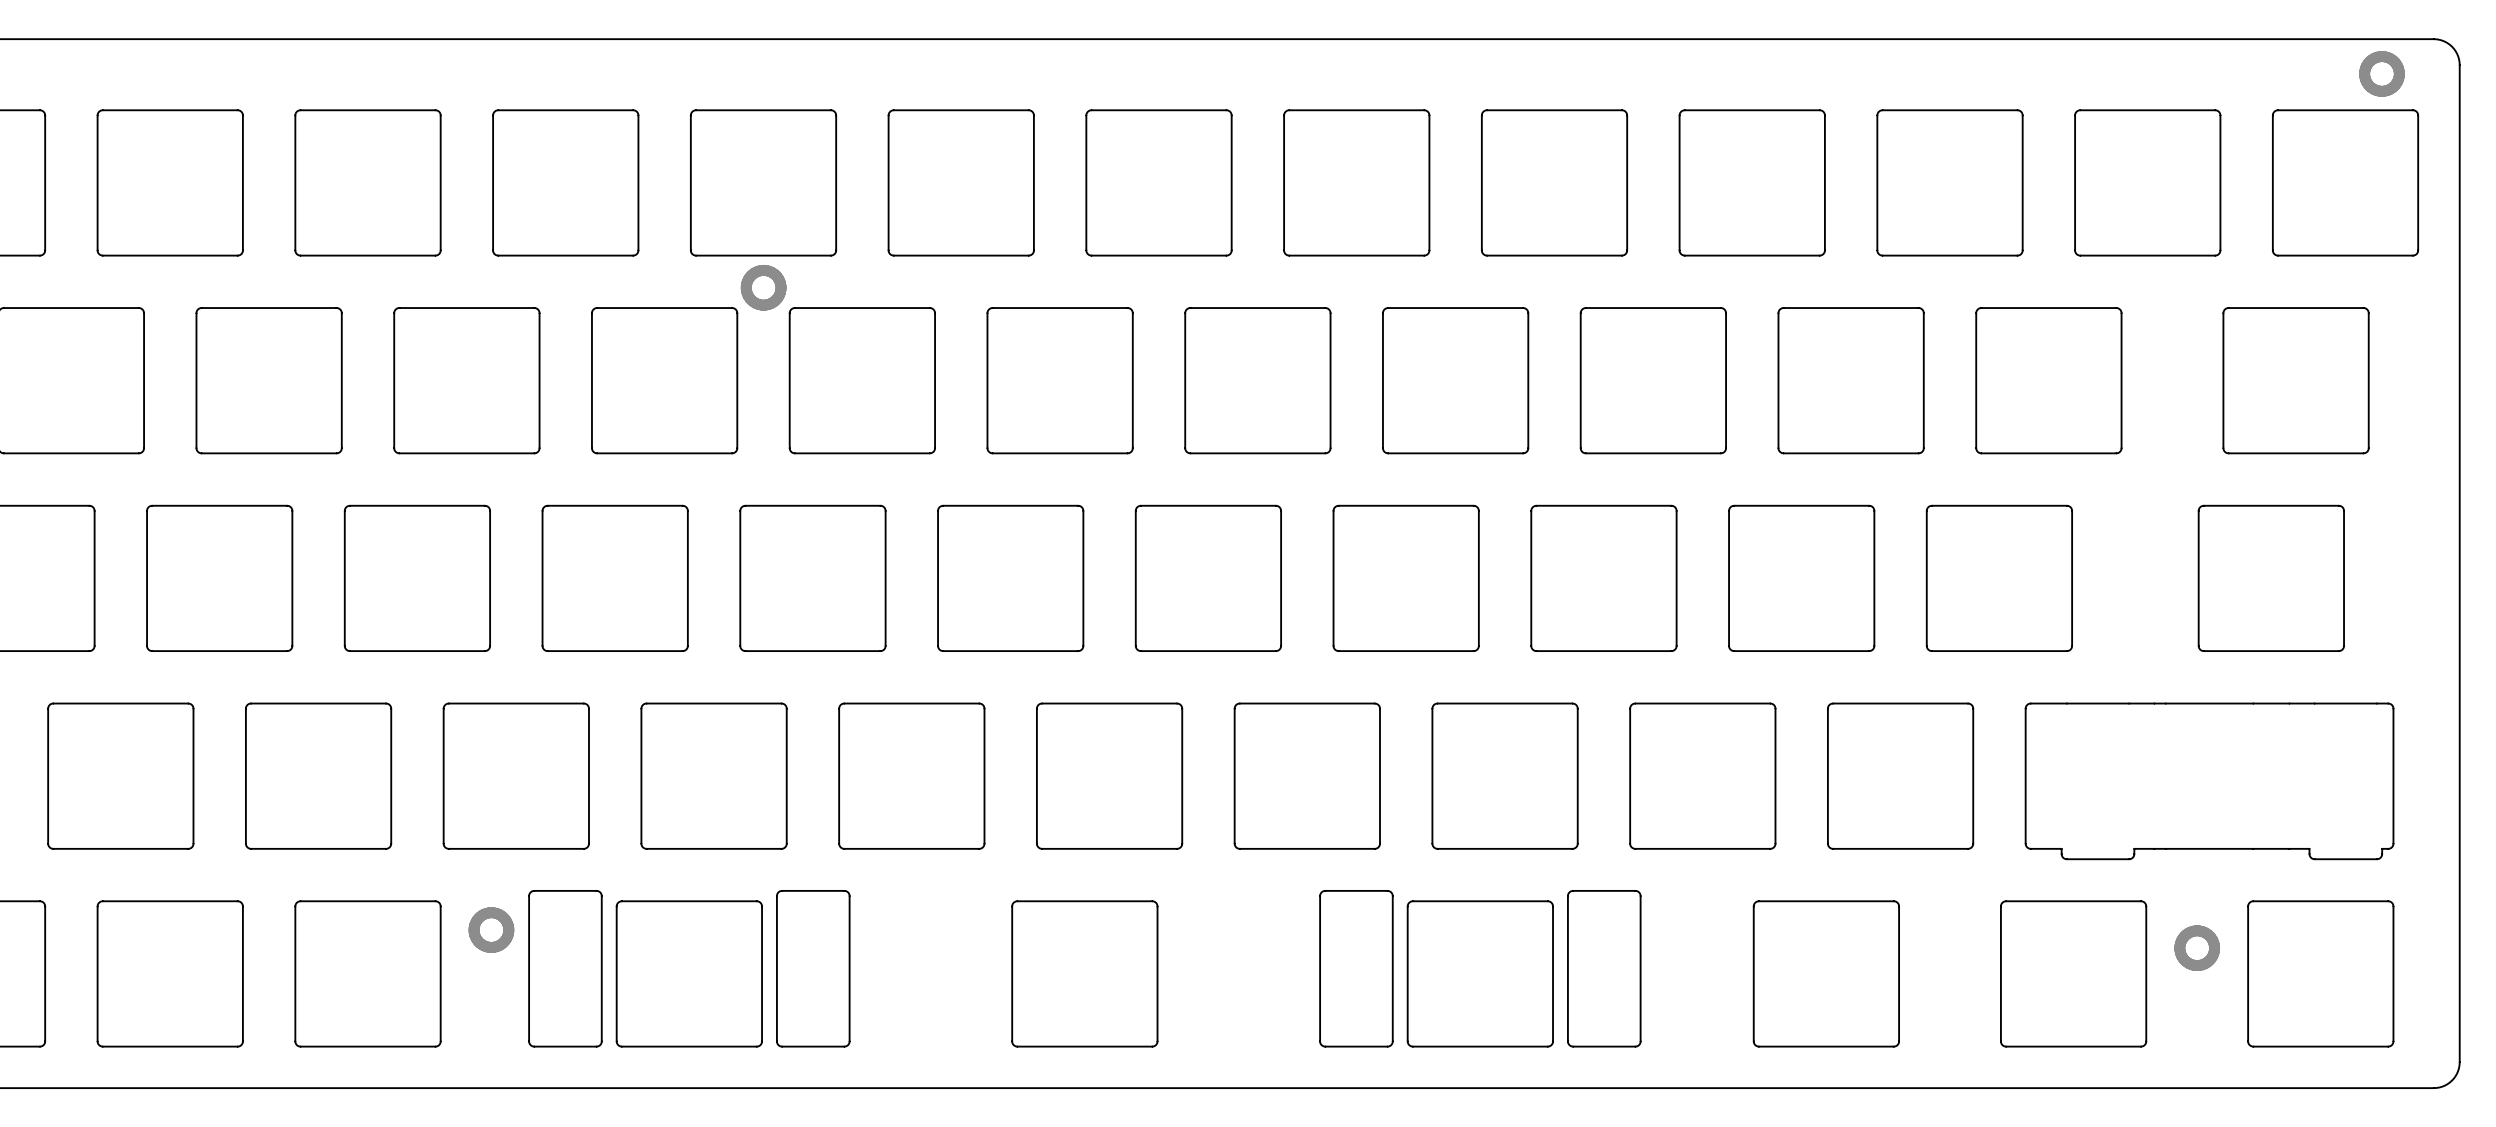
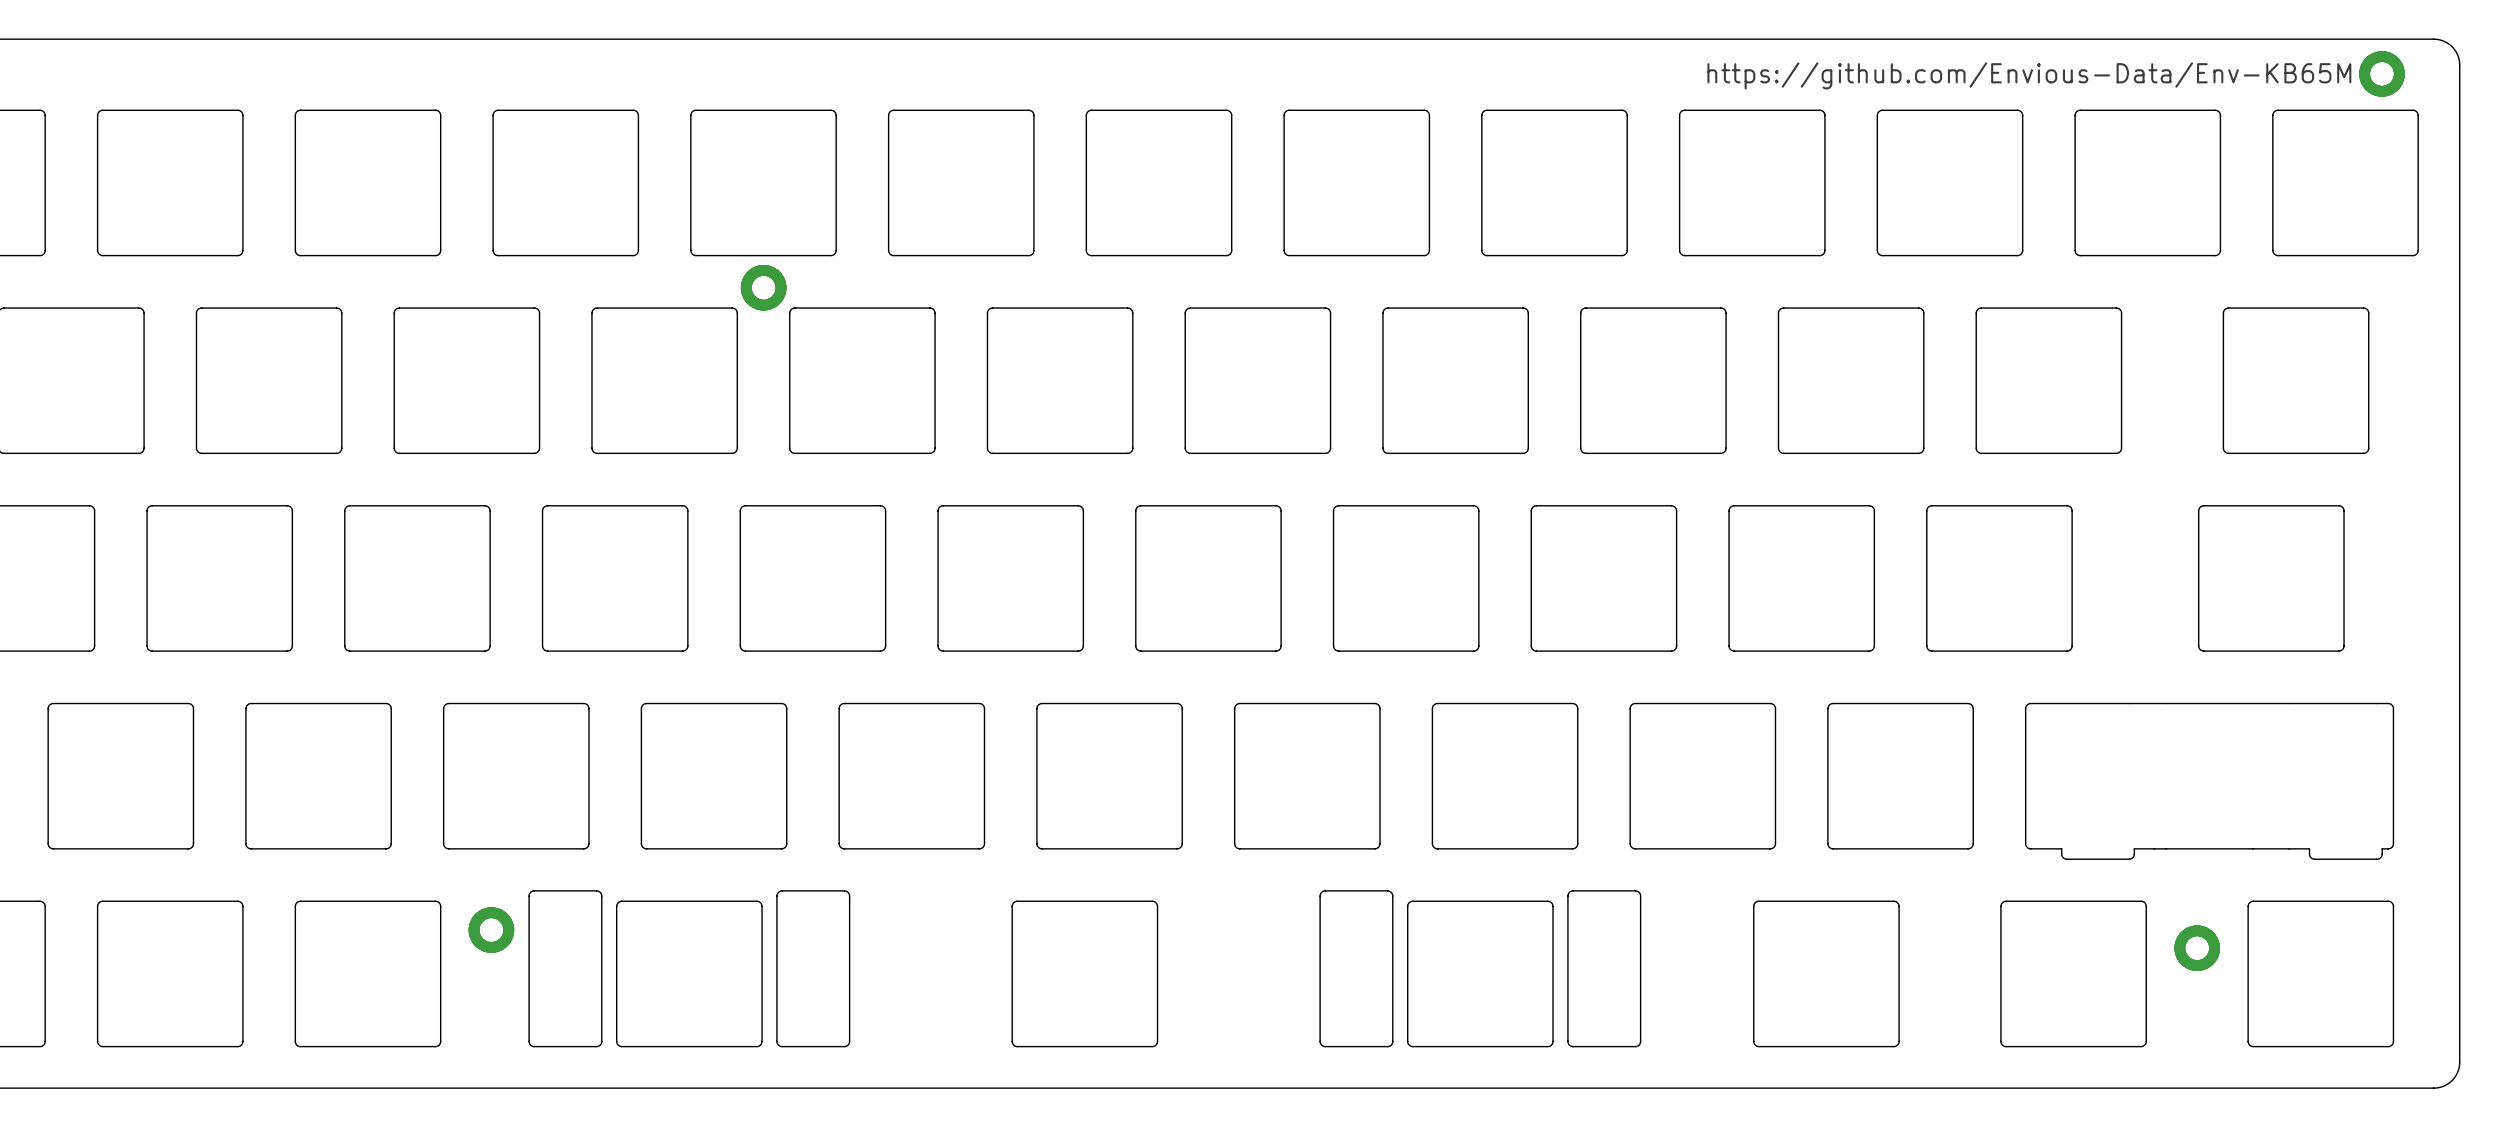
text: none -> https://github.com/Envious-Data/Env-KB65M (2029, 75)

